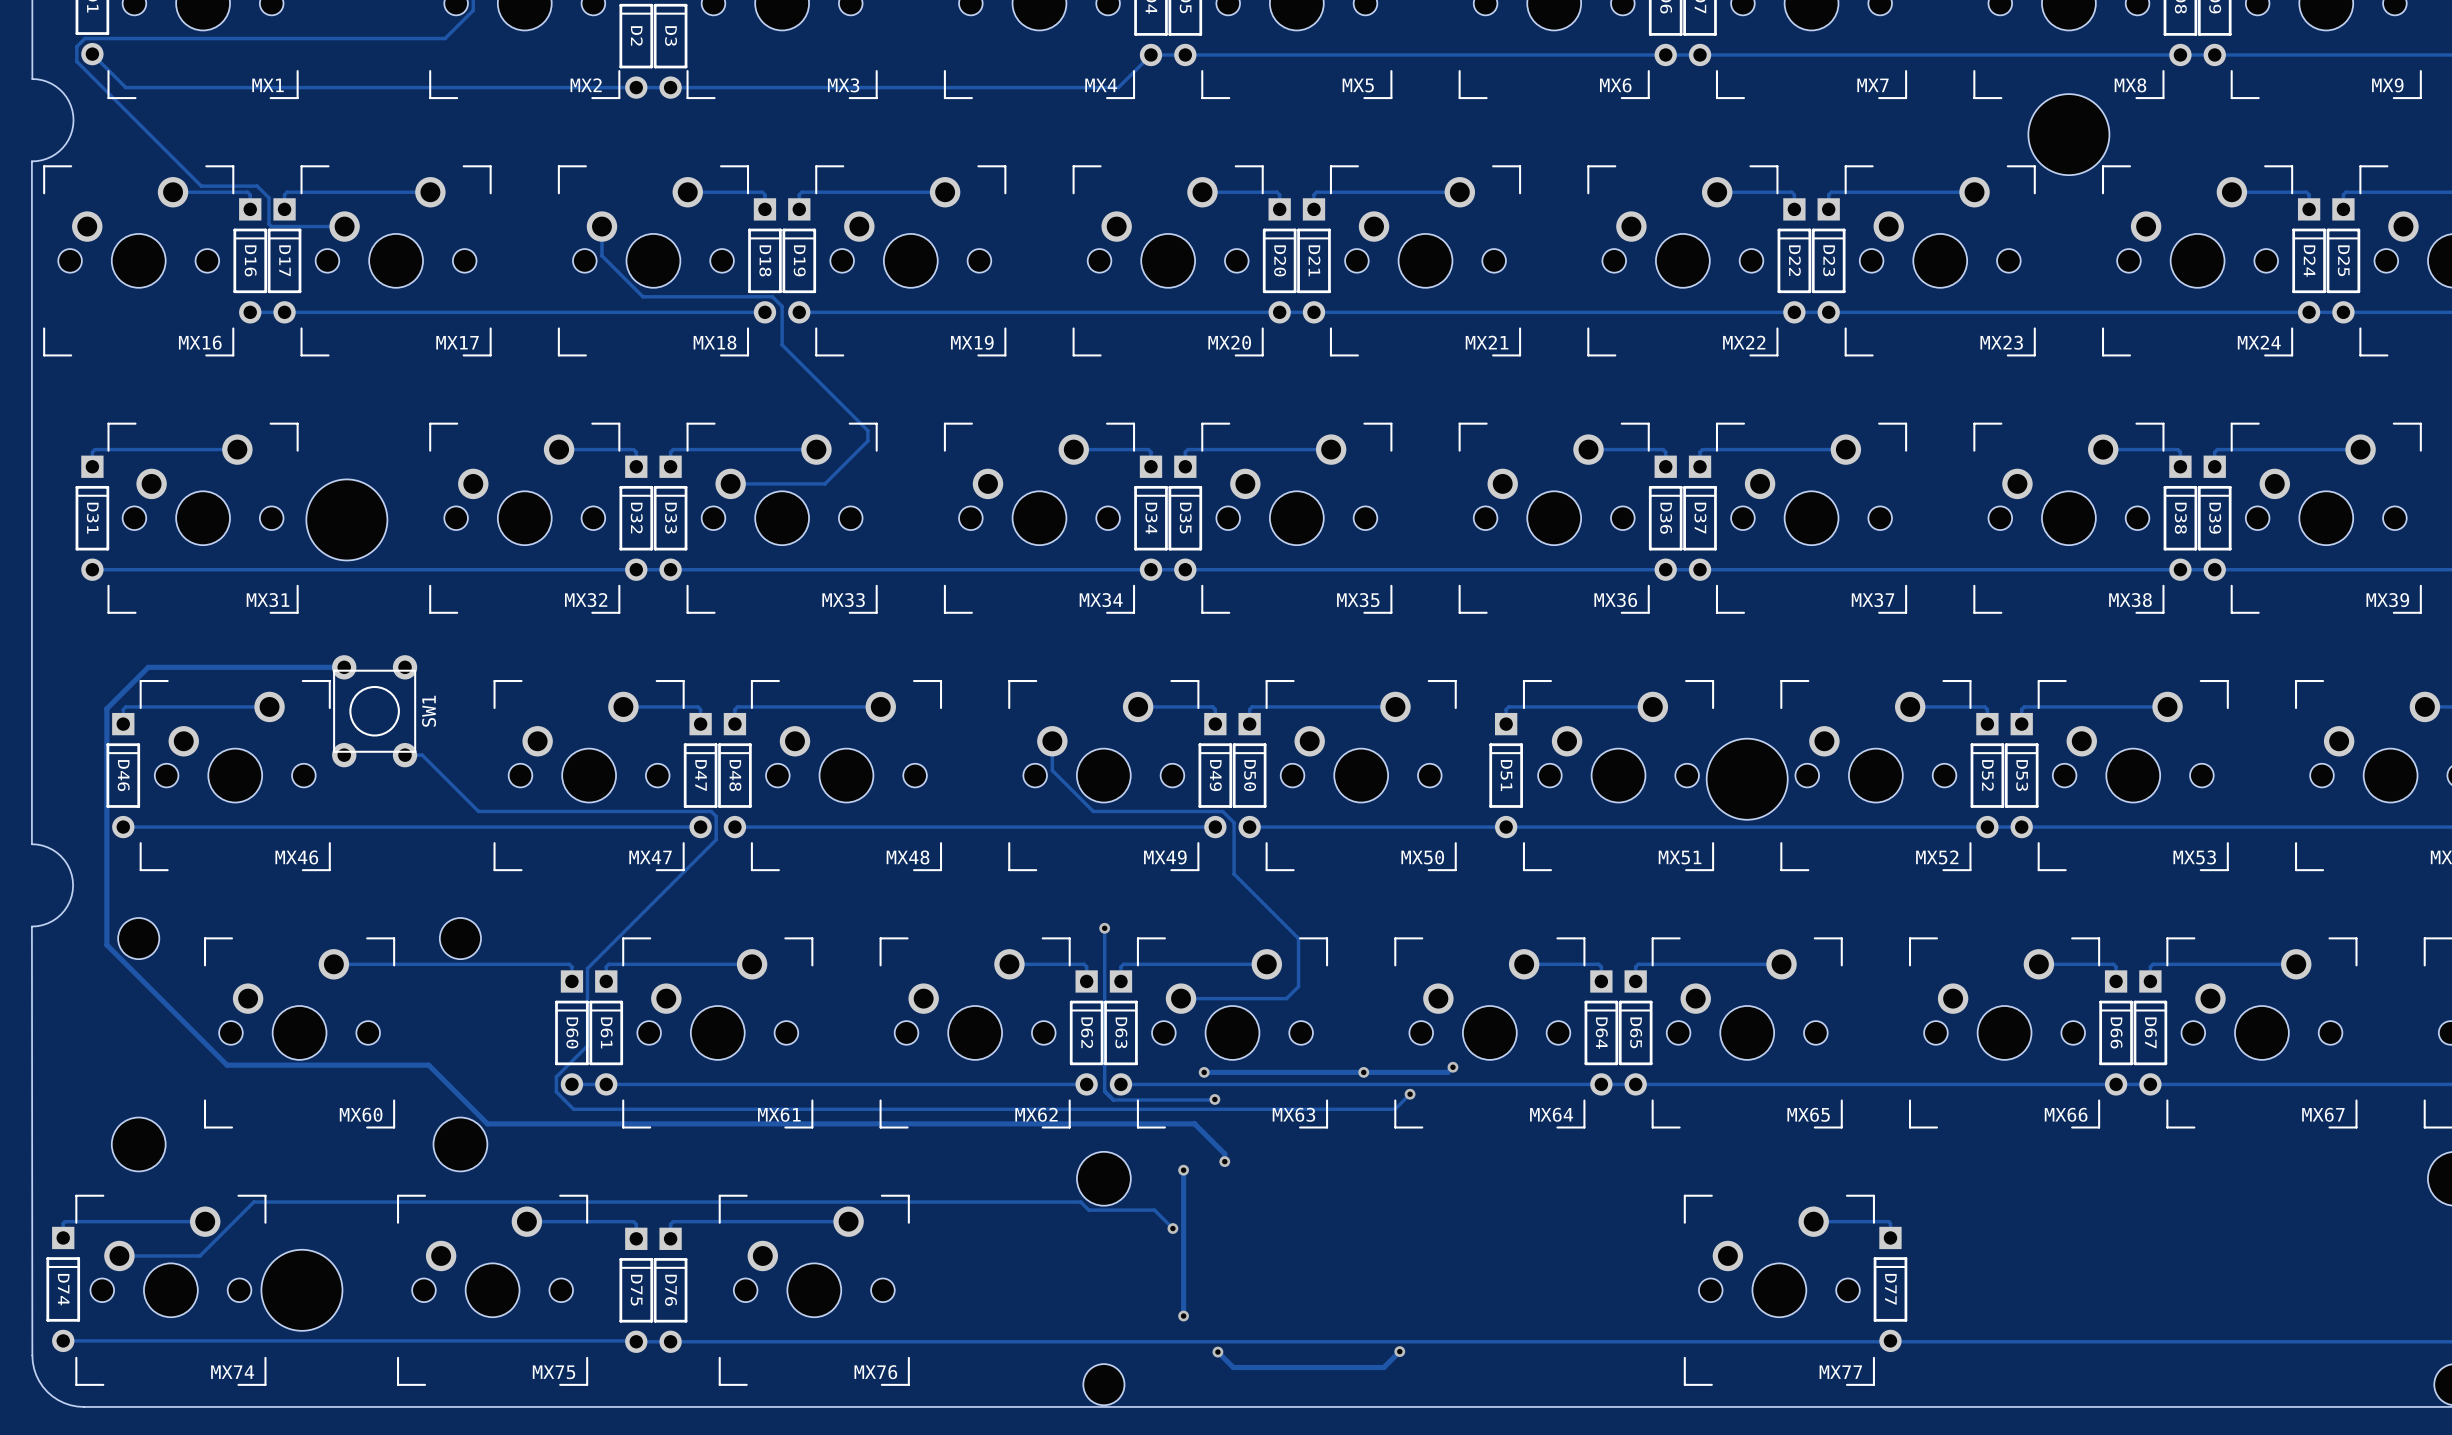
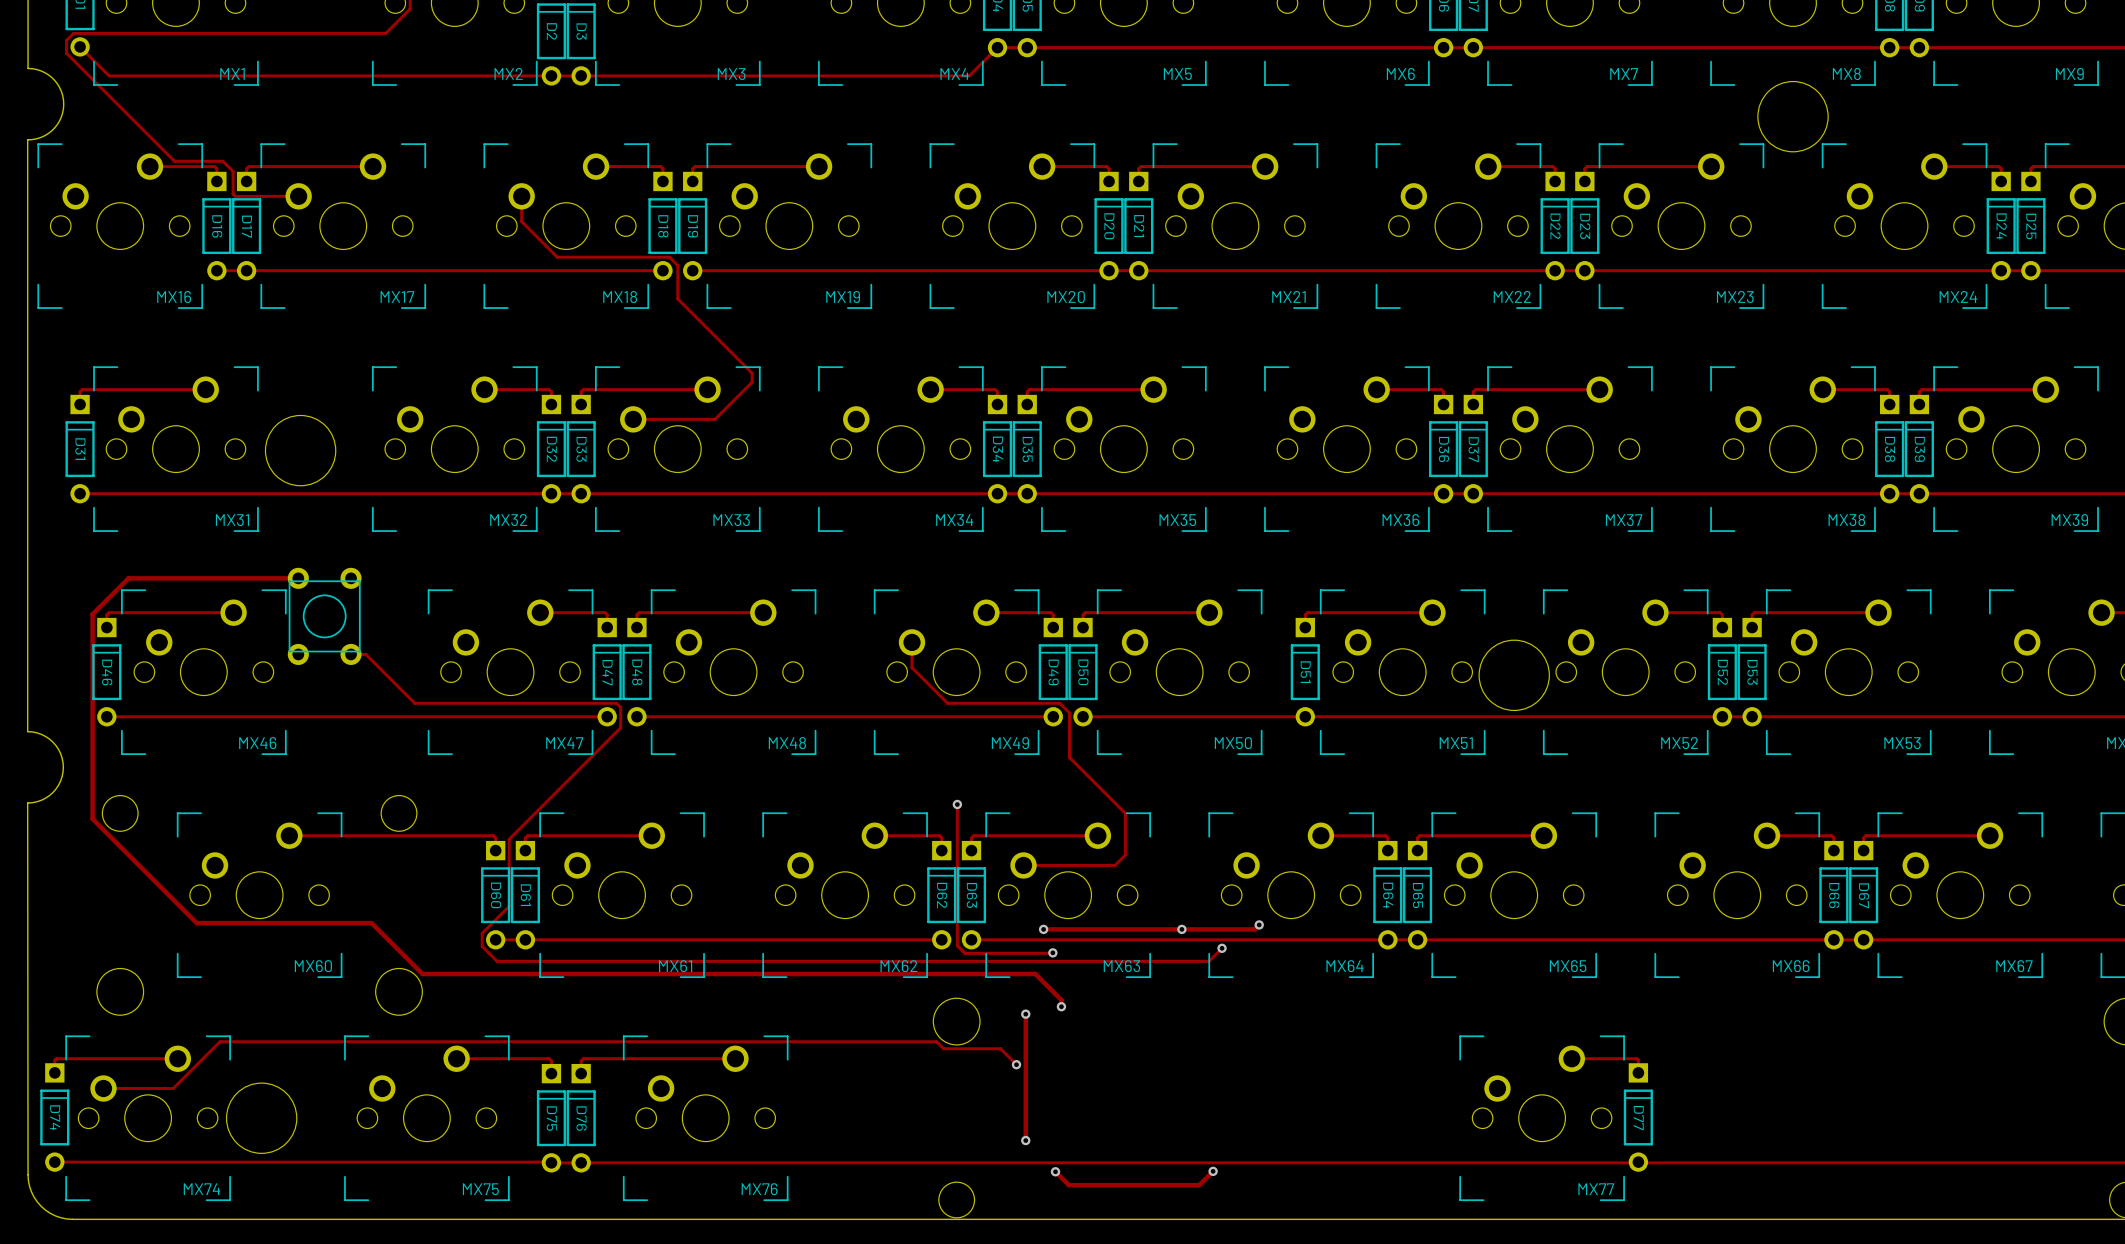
SW1 name: SW1 (429, 711) -> none

